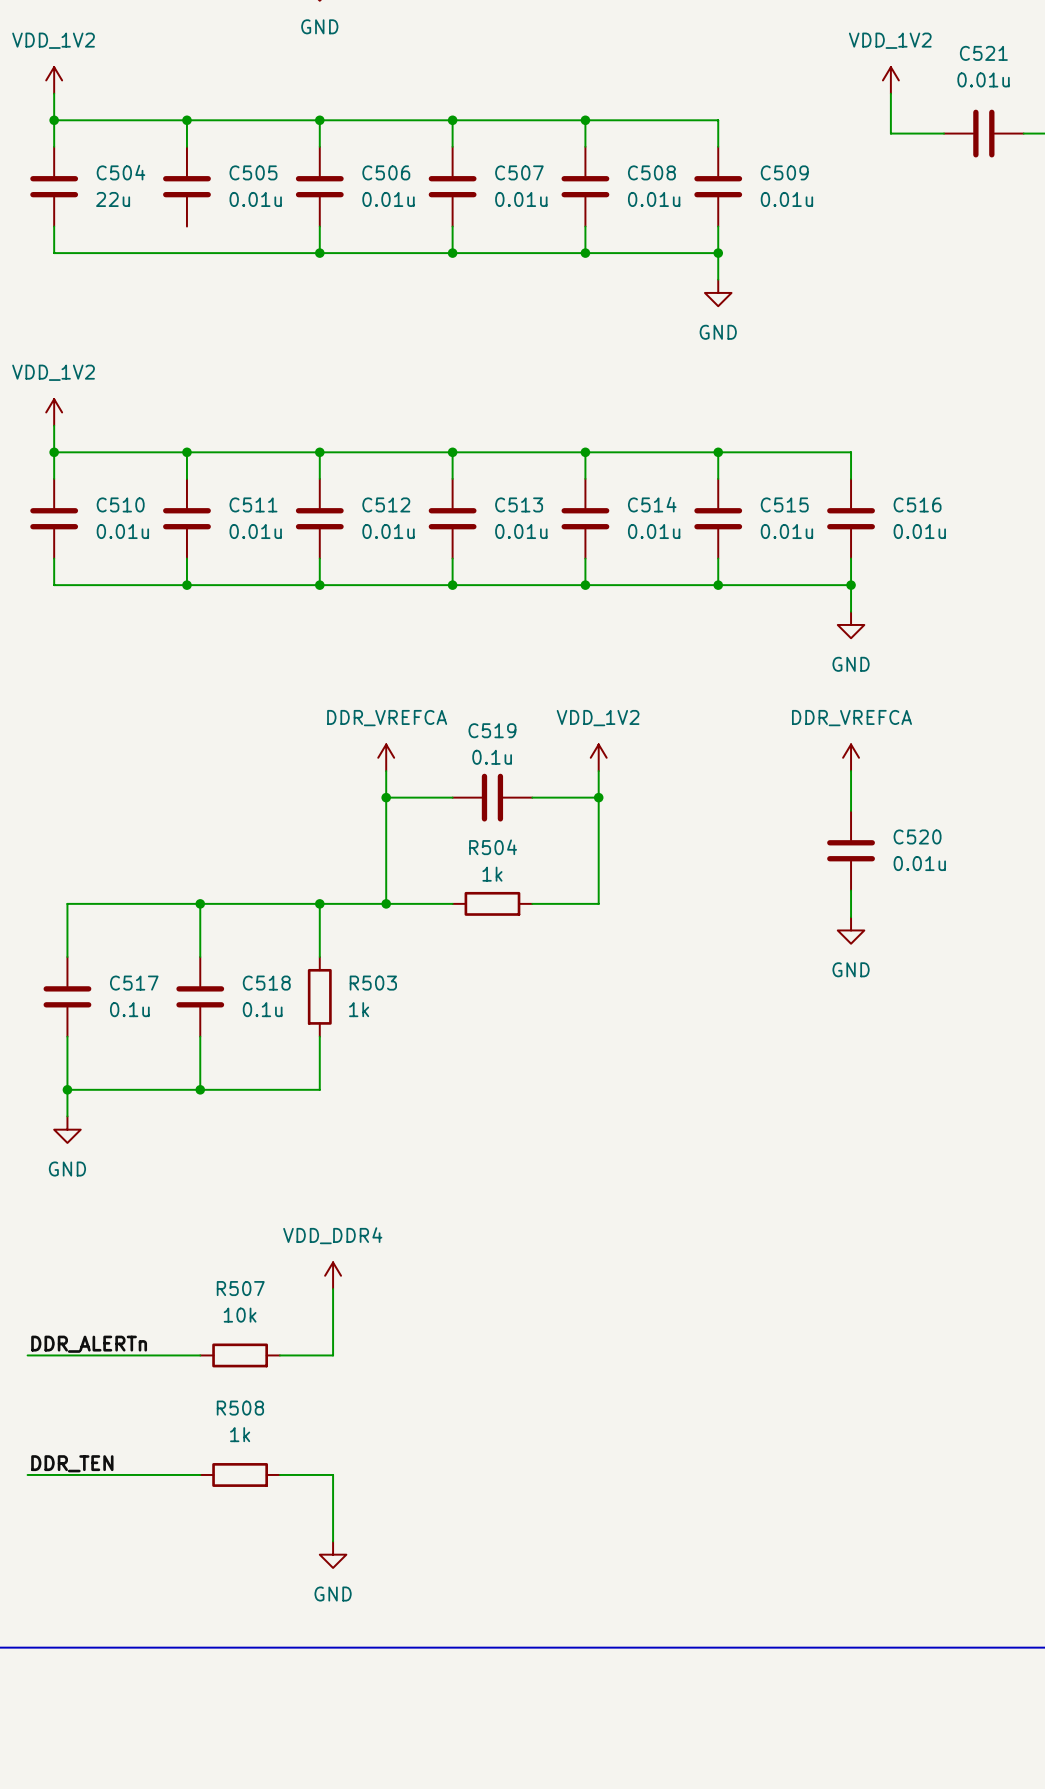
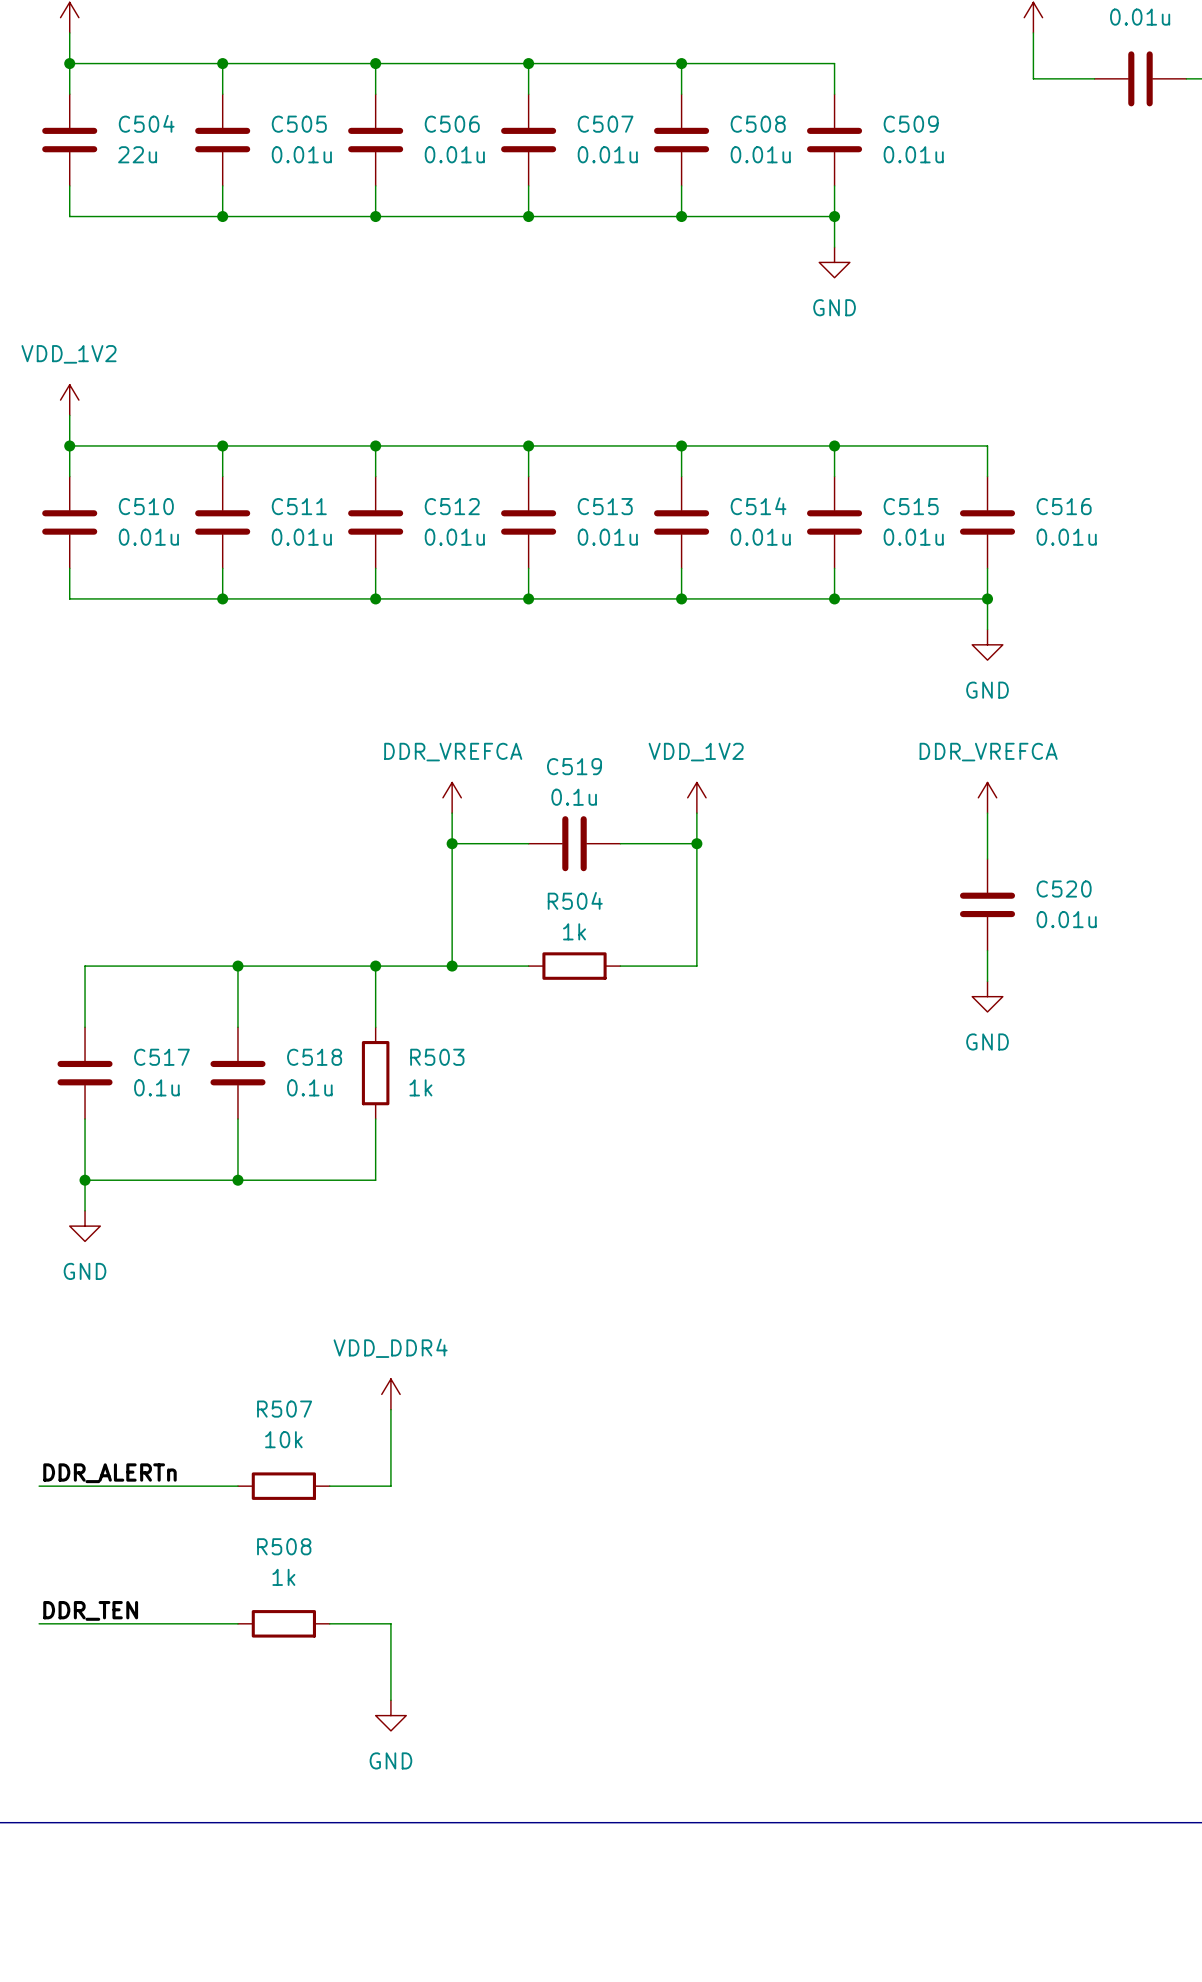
wire: none -> (222, 185) (222, 216)
junction: none -> (222, 216)

